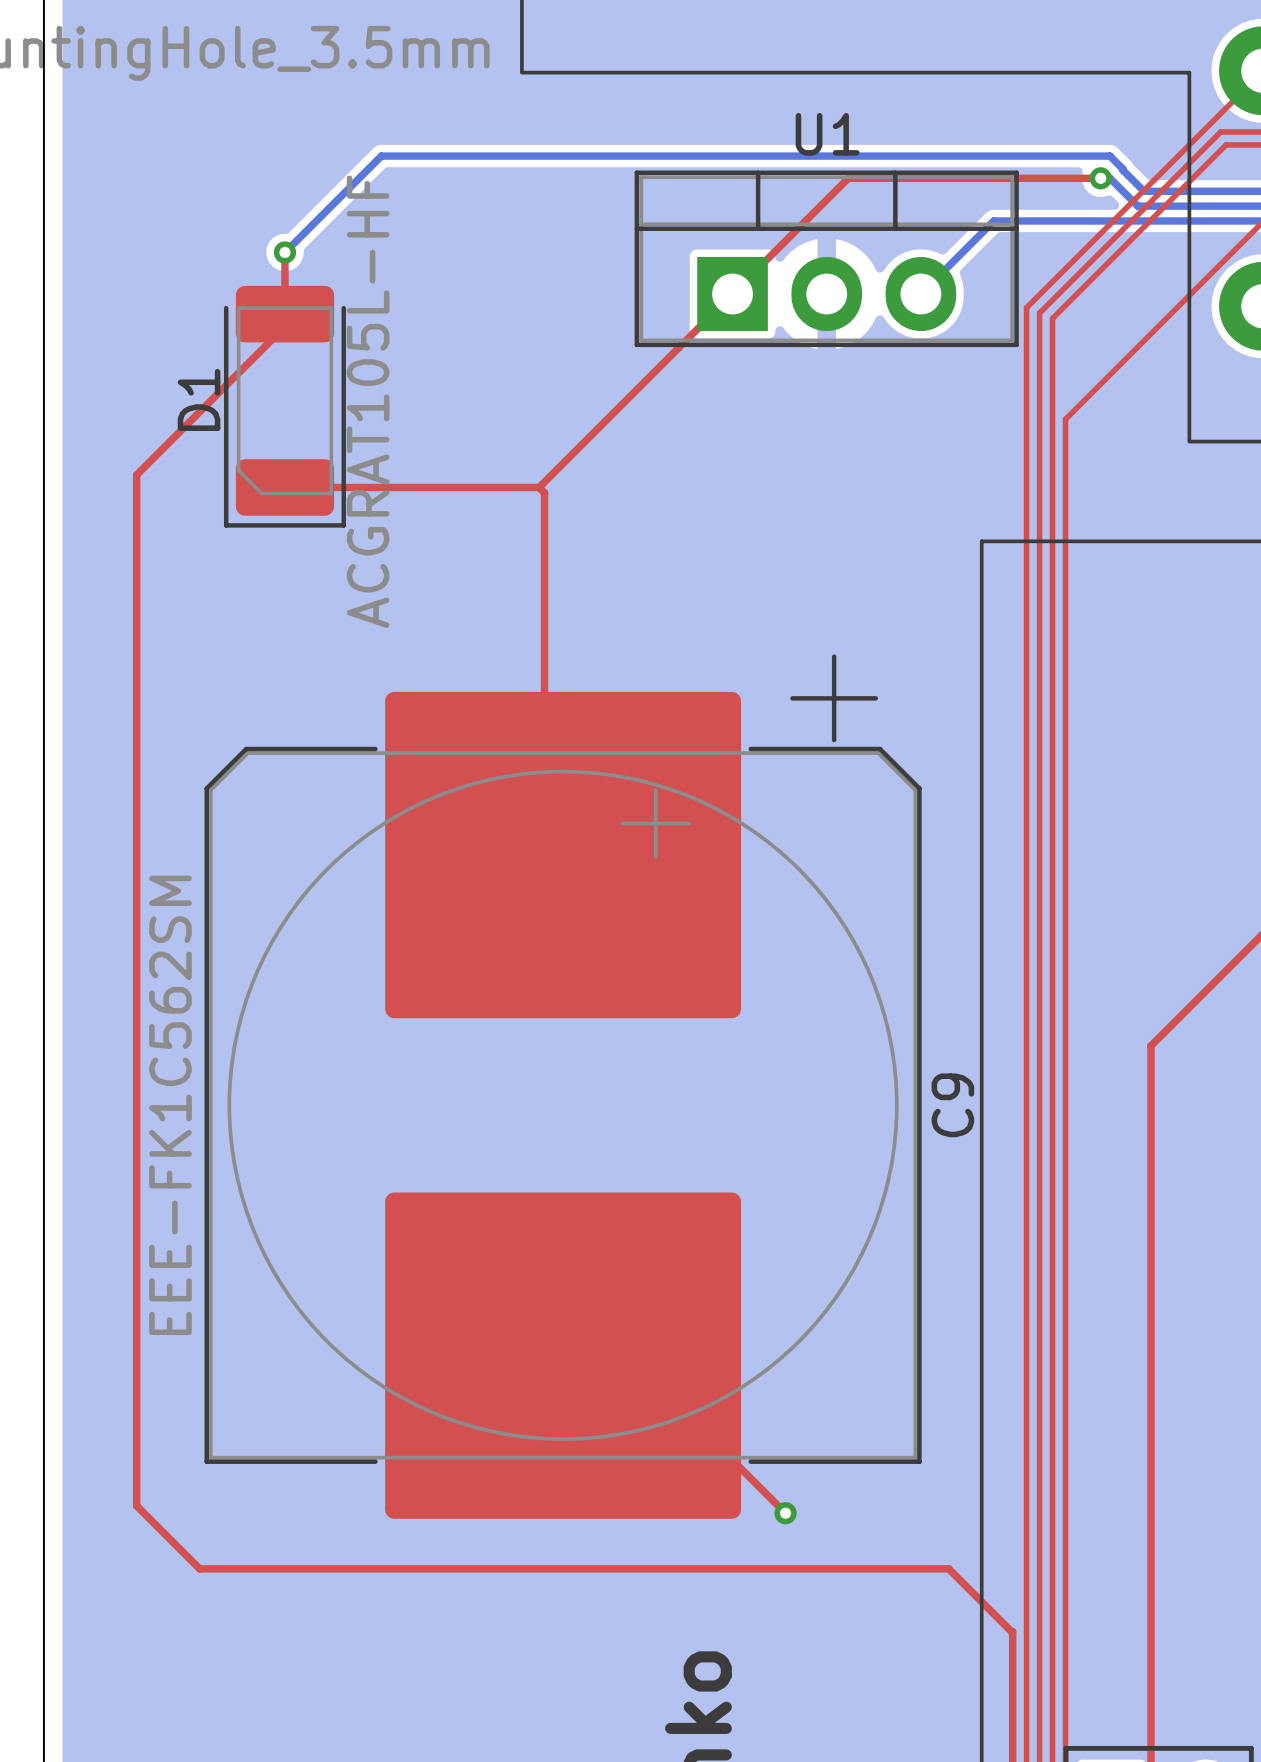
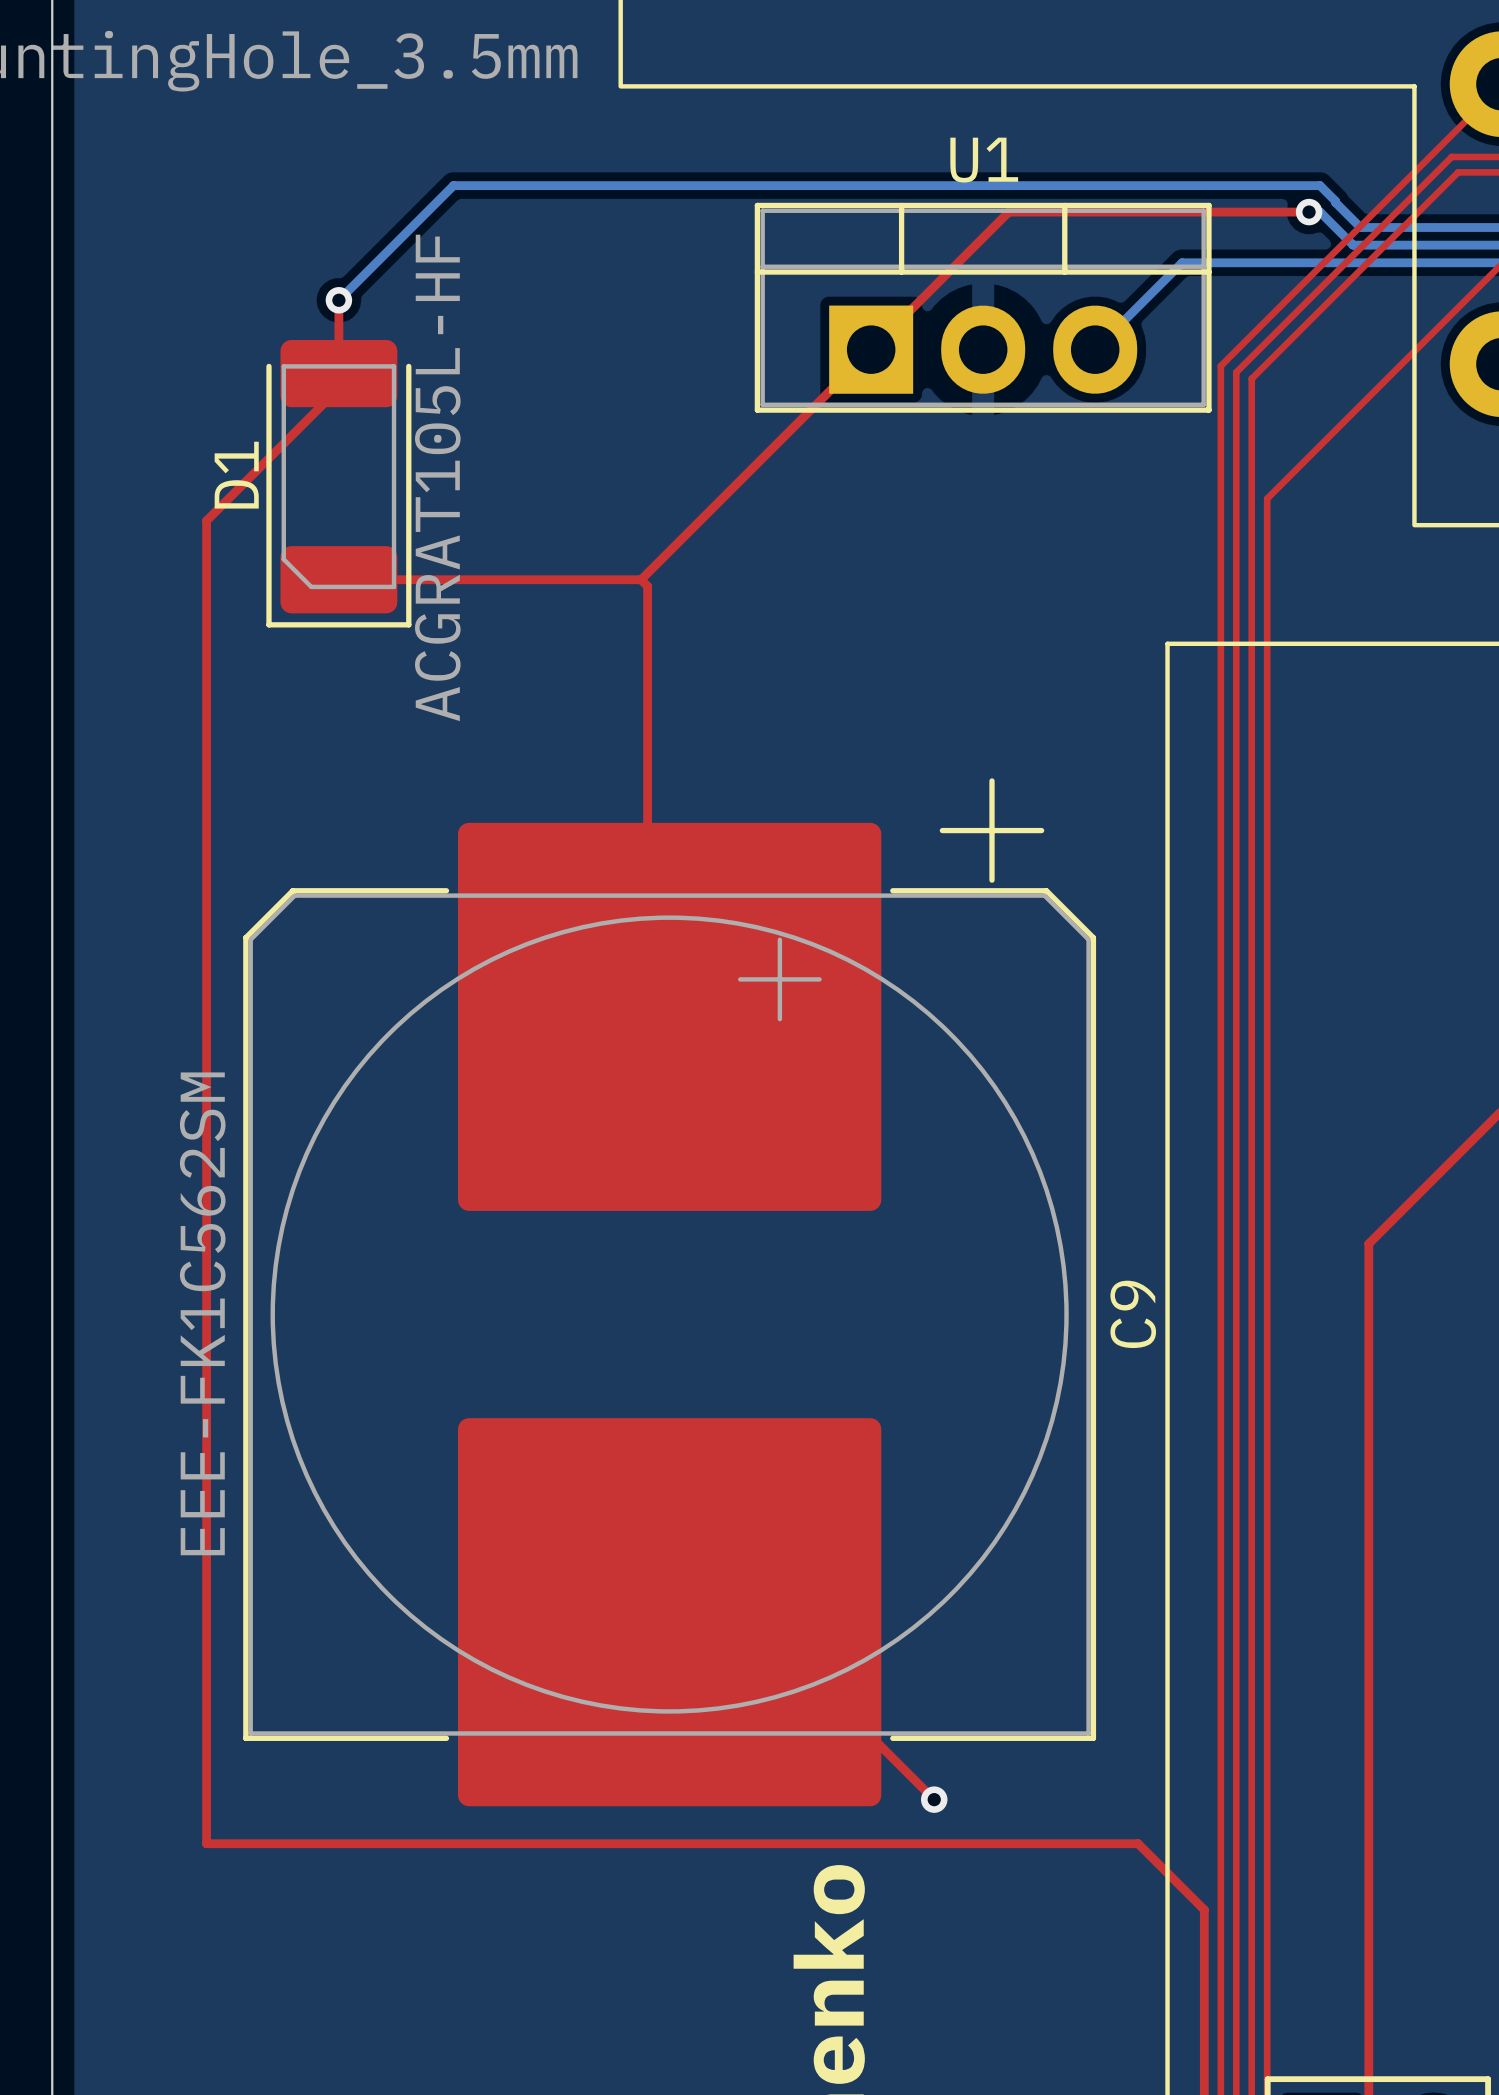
top track: (173, 437) (136, 474) (136, 1505) (199, 1568) (948, 1568) (1012, 1631) -> (206, 520) (206, 1843) (1138, 1843) (1204, 1909) (1204, 1940)

